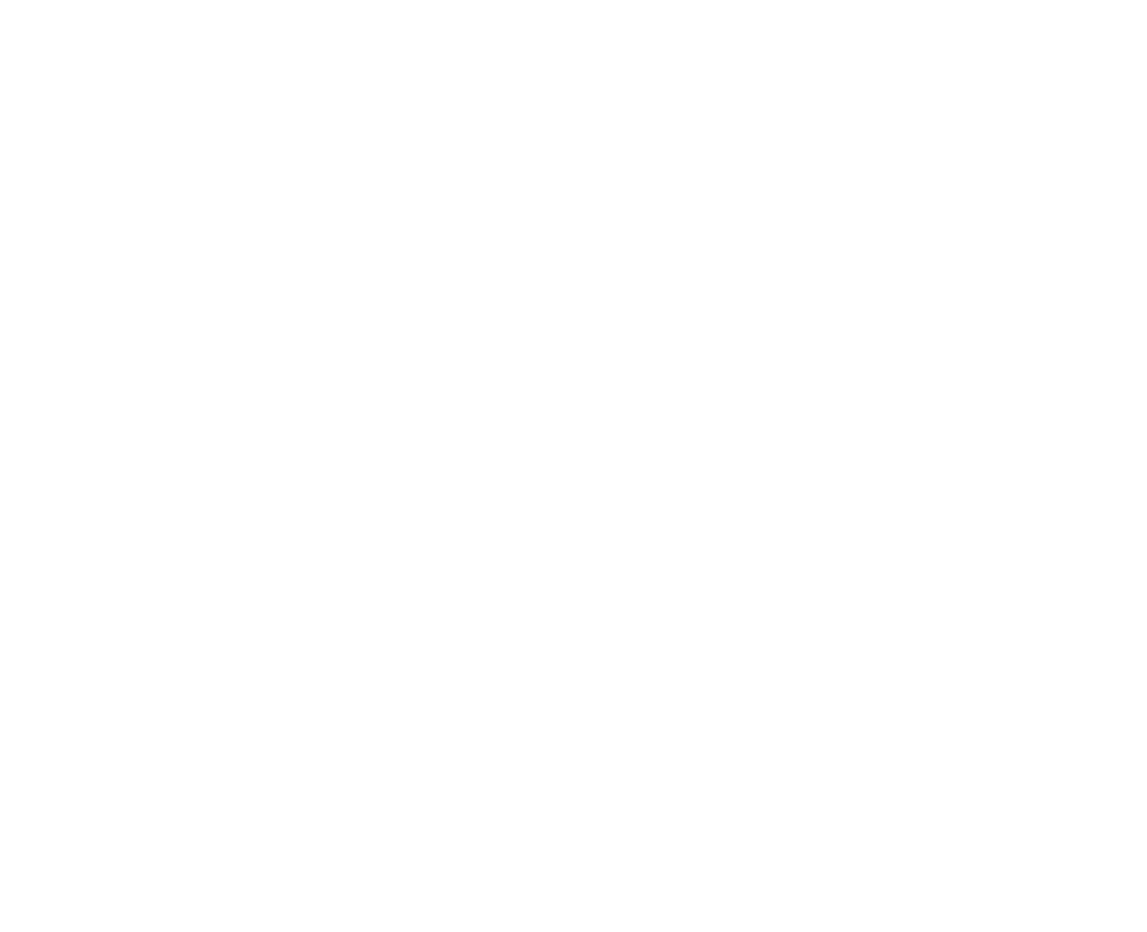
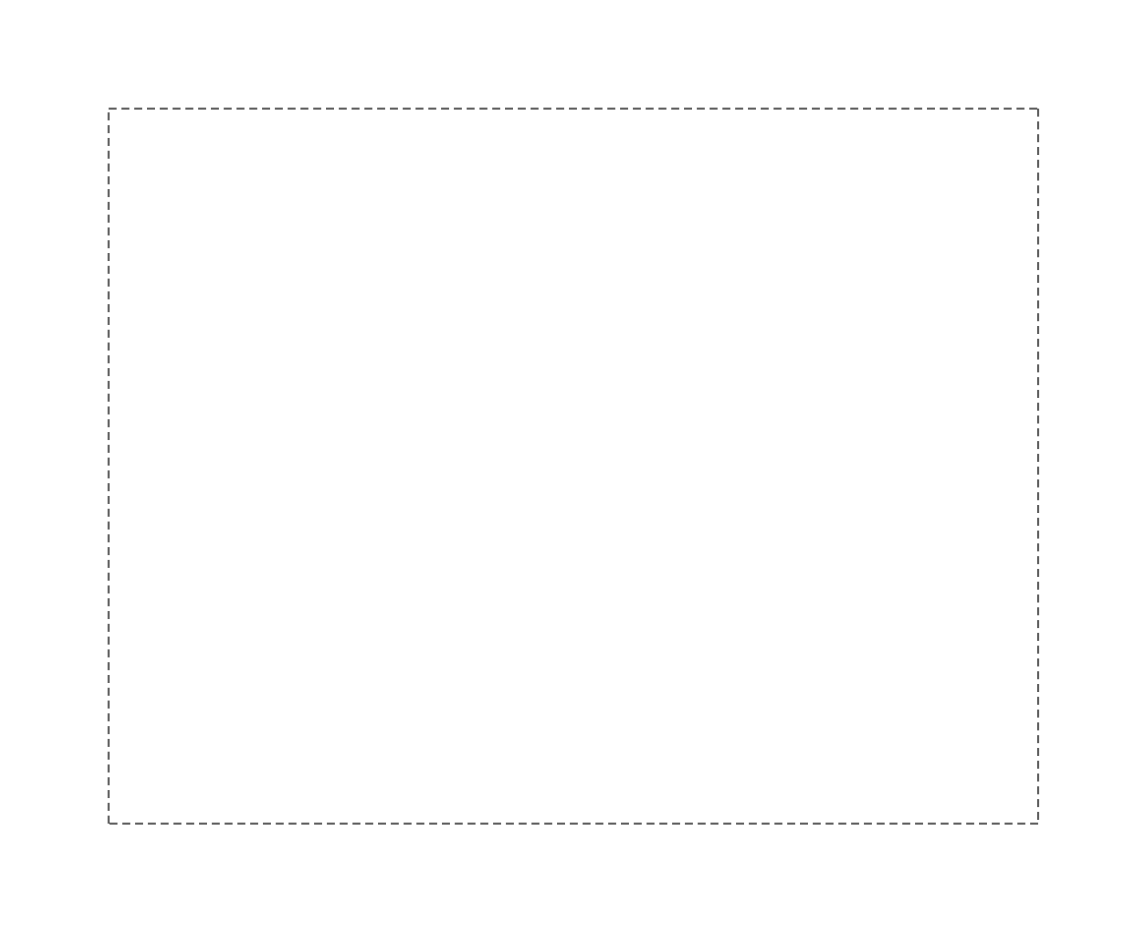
line: none -> (108, 108) (1038, 108) (1038, 823) (108, 823) (108, 108)

